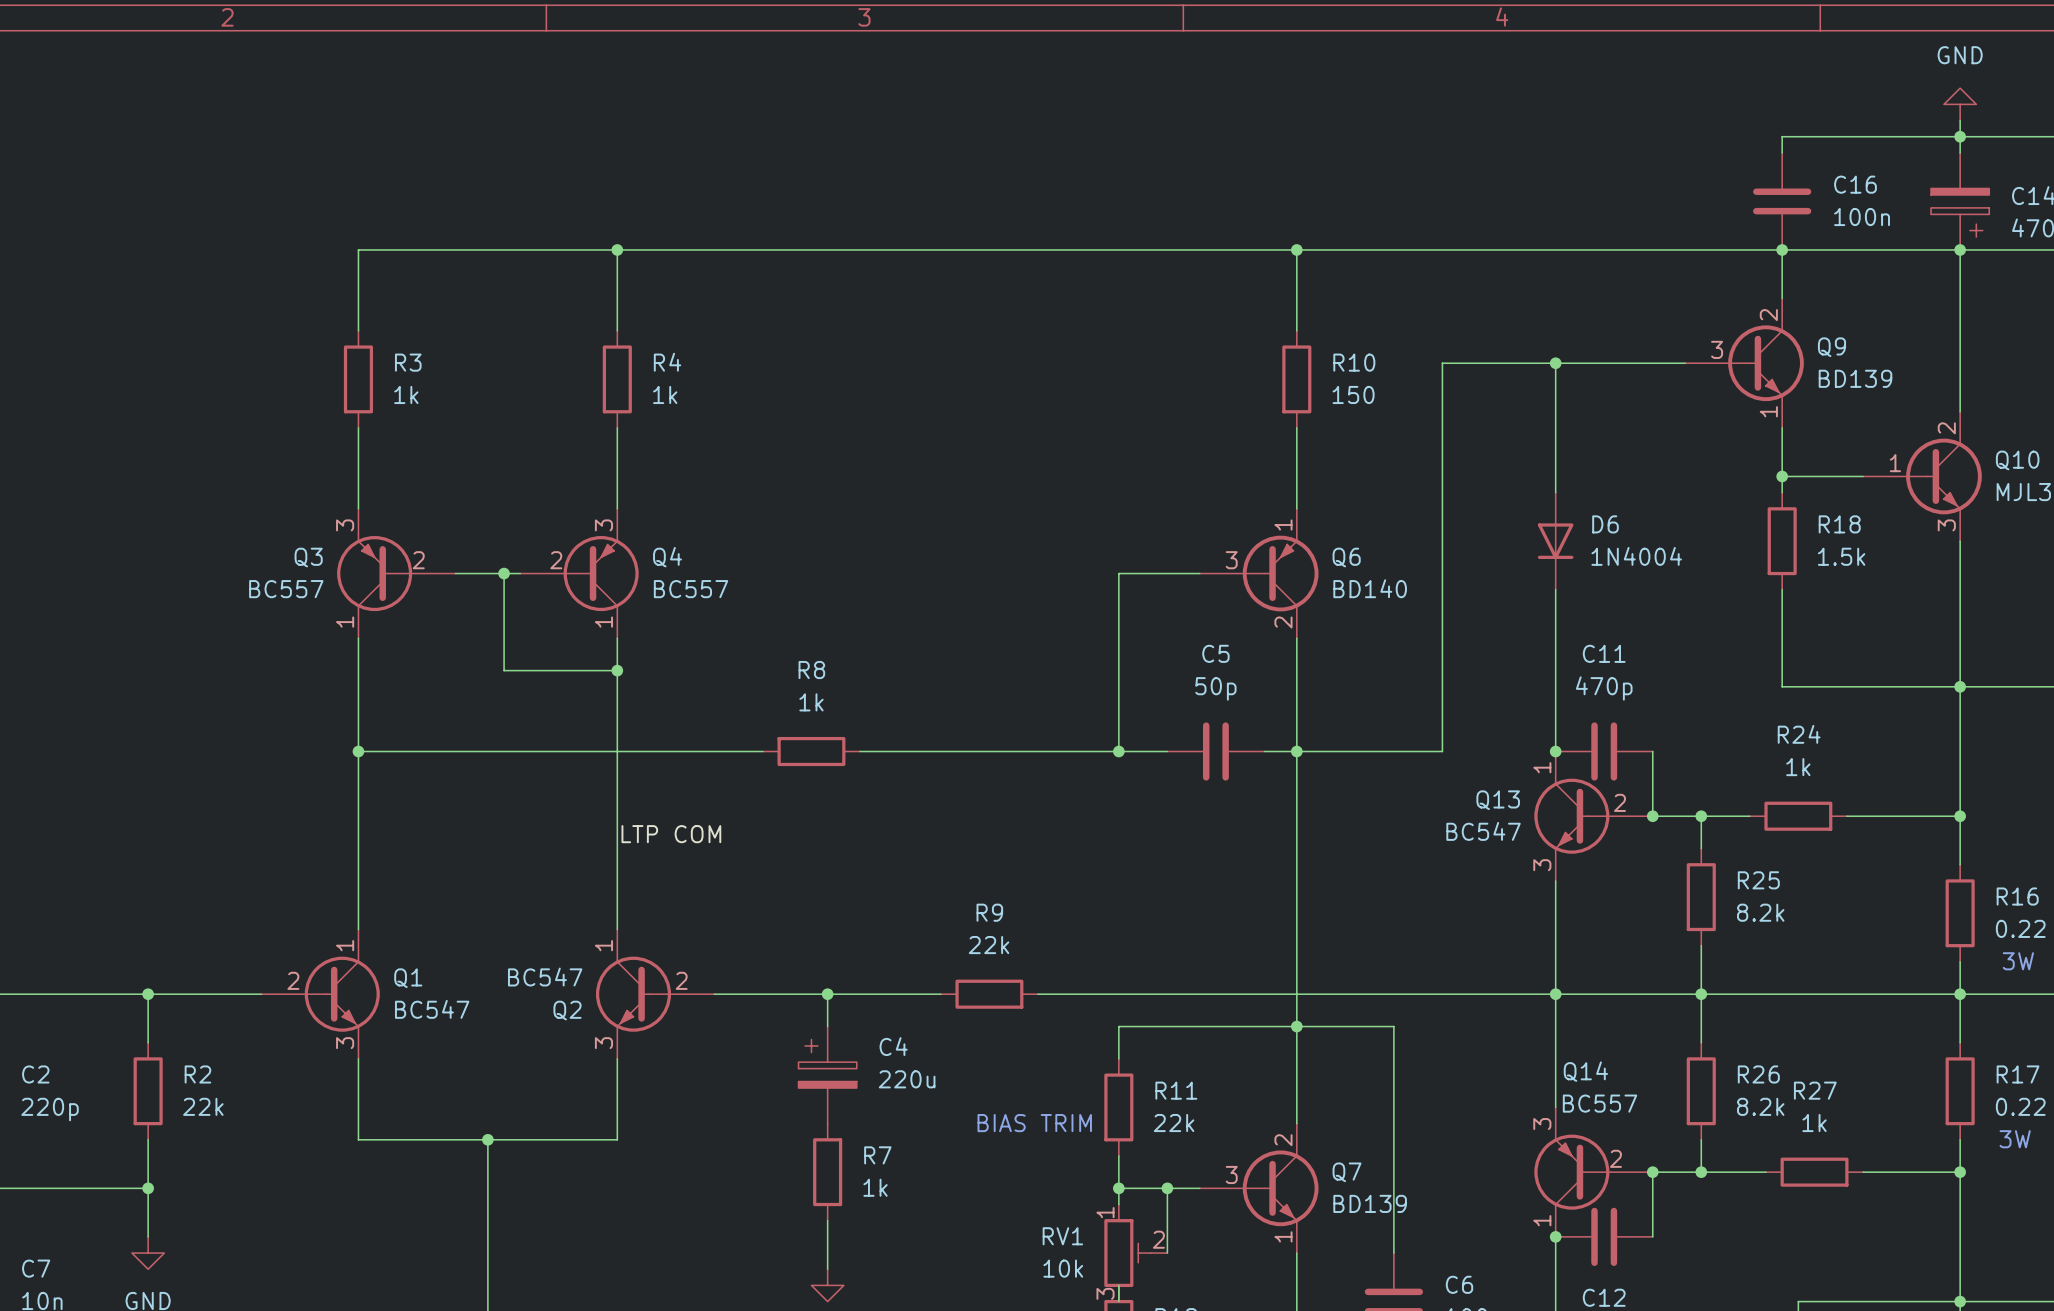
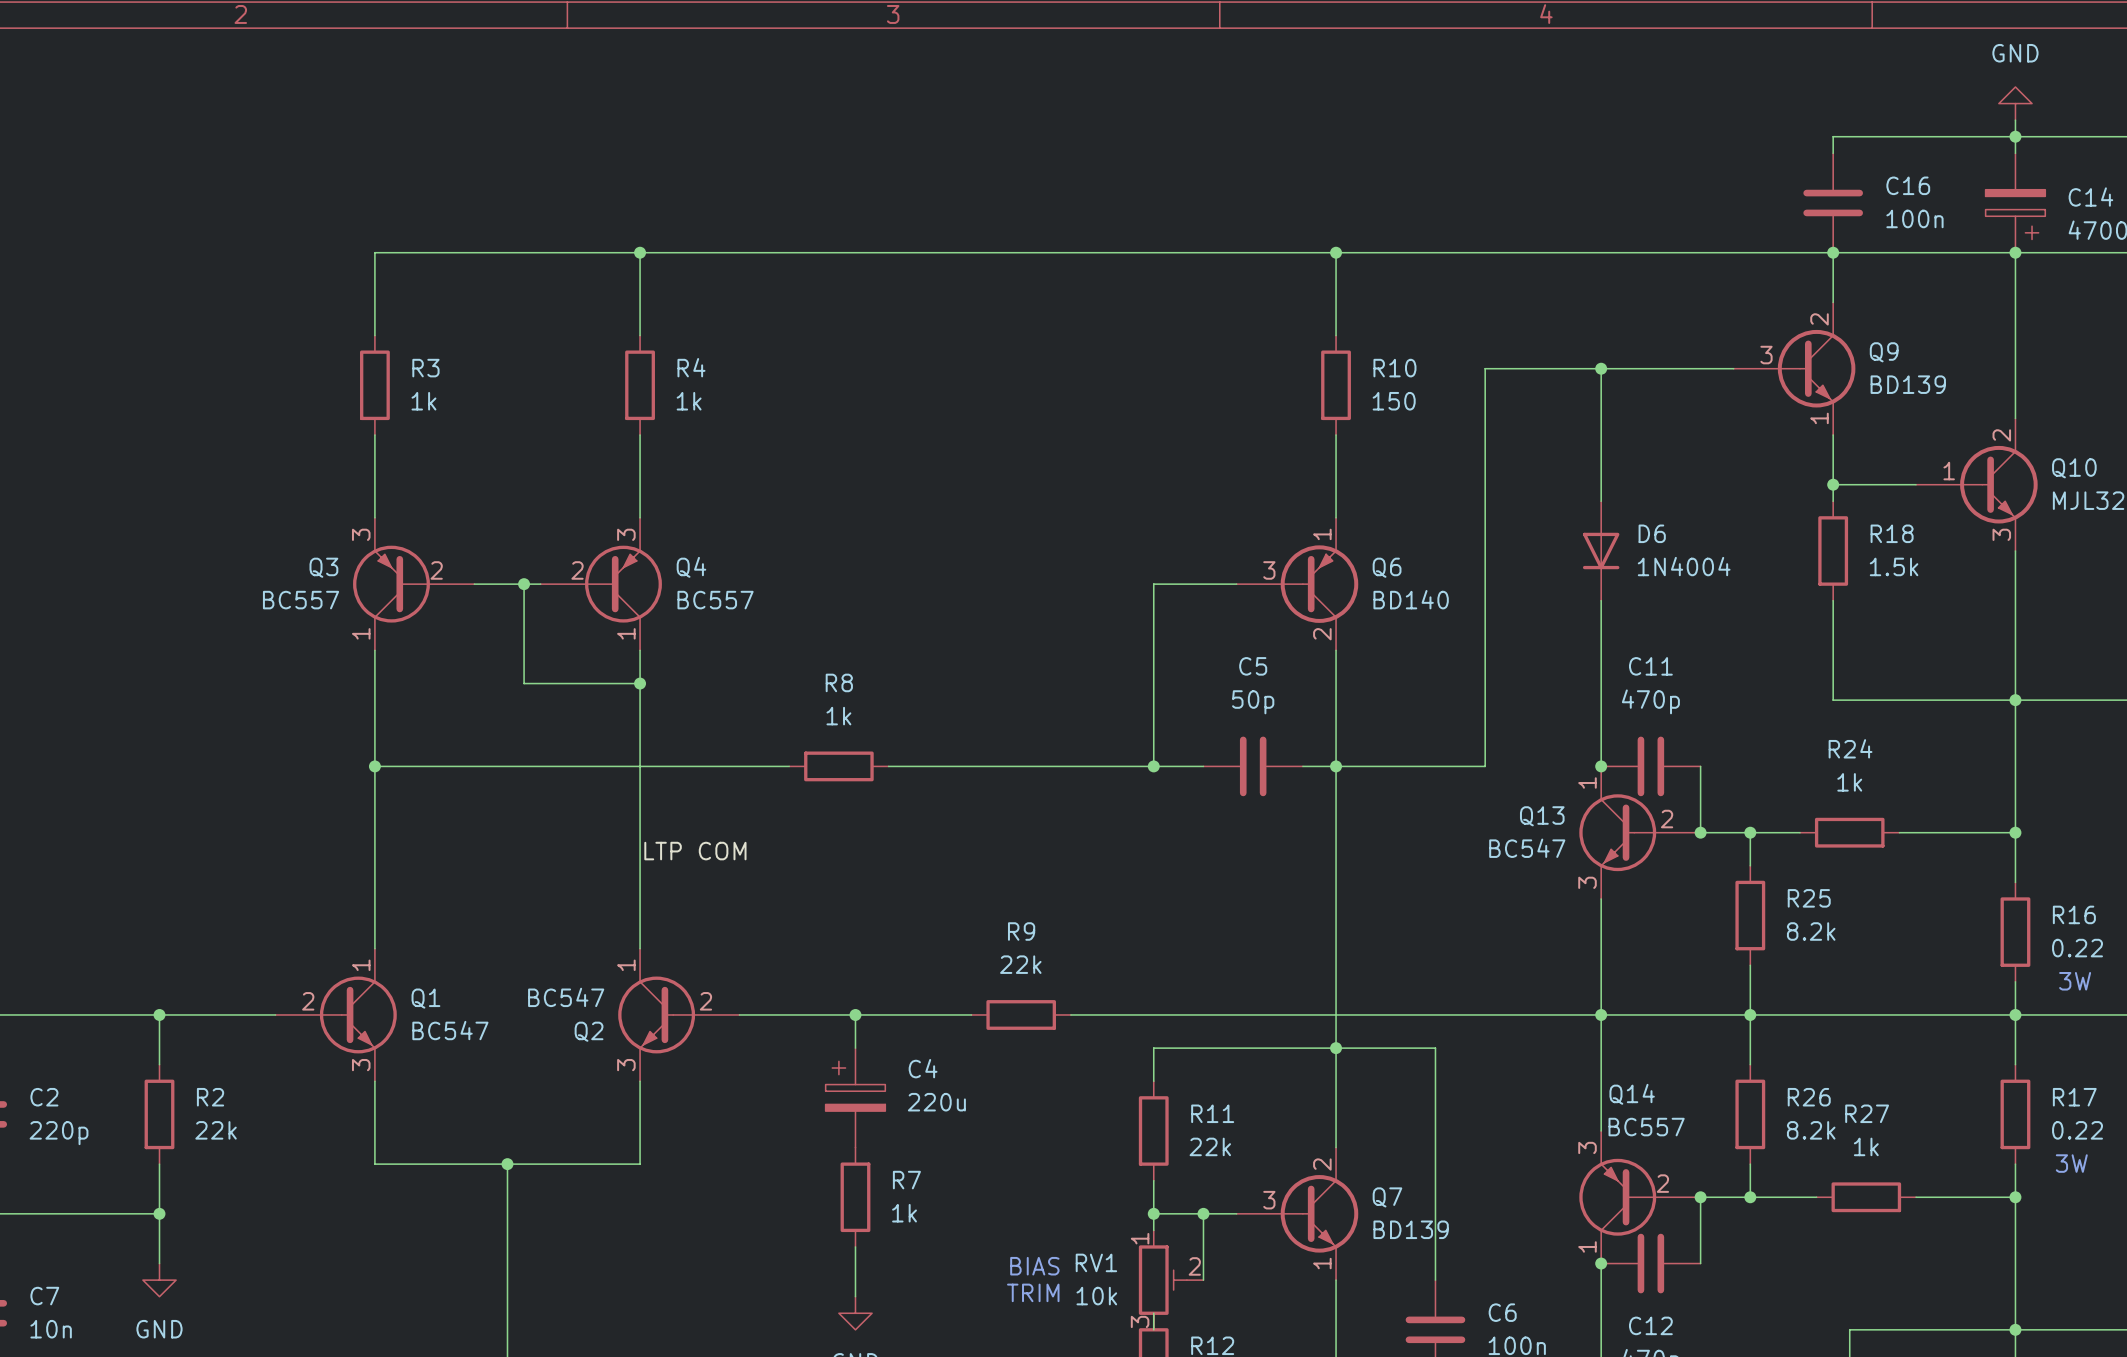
text: BIAS TRIM (1034, 1123) -> none
text: none -> BIAS (1034, 1266)
text: none -> TRIM (1033, 1292)

